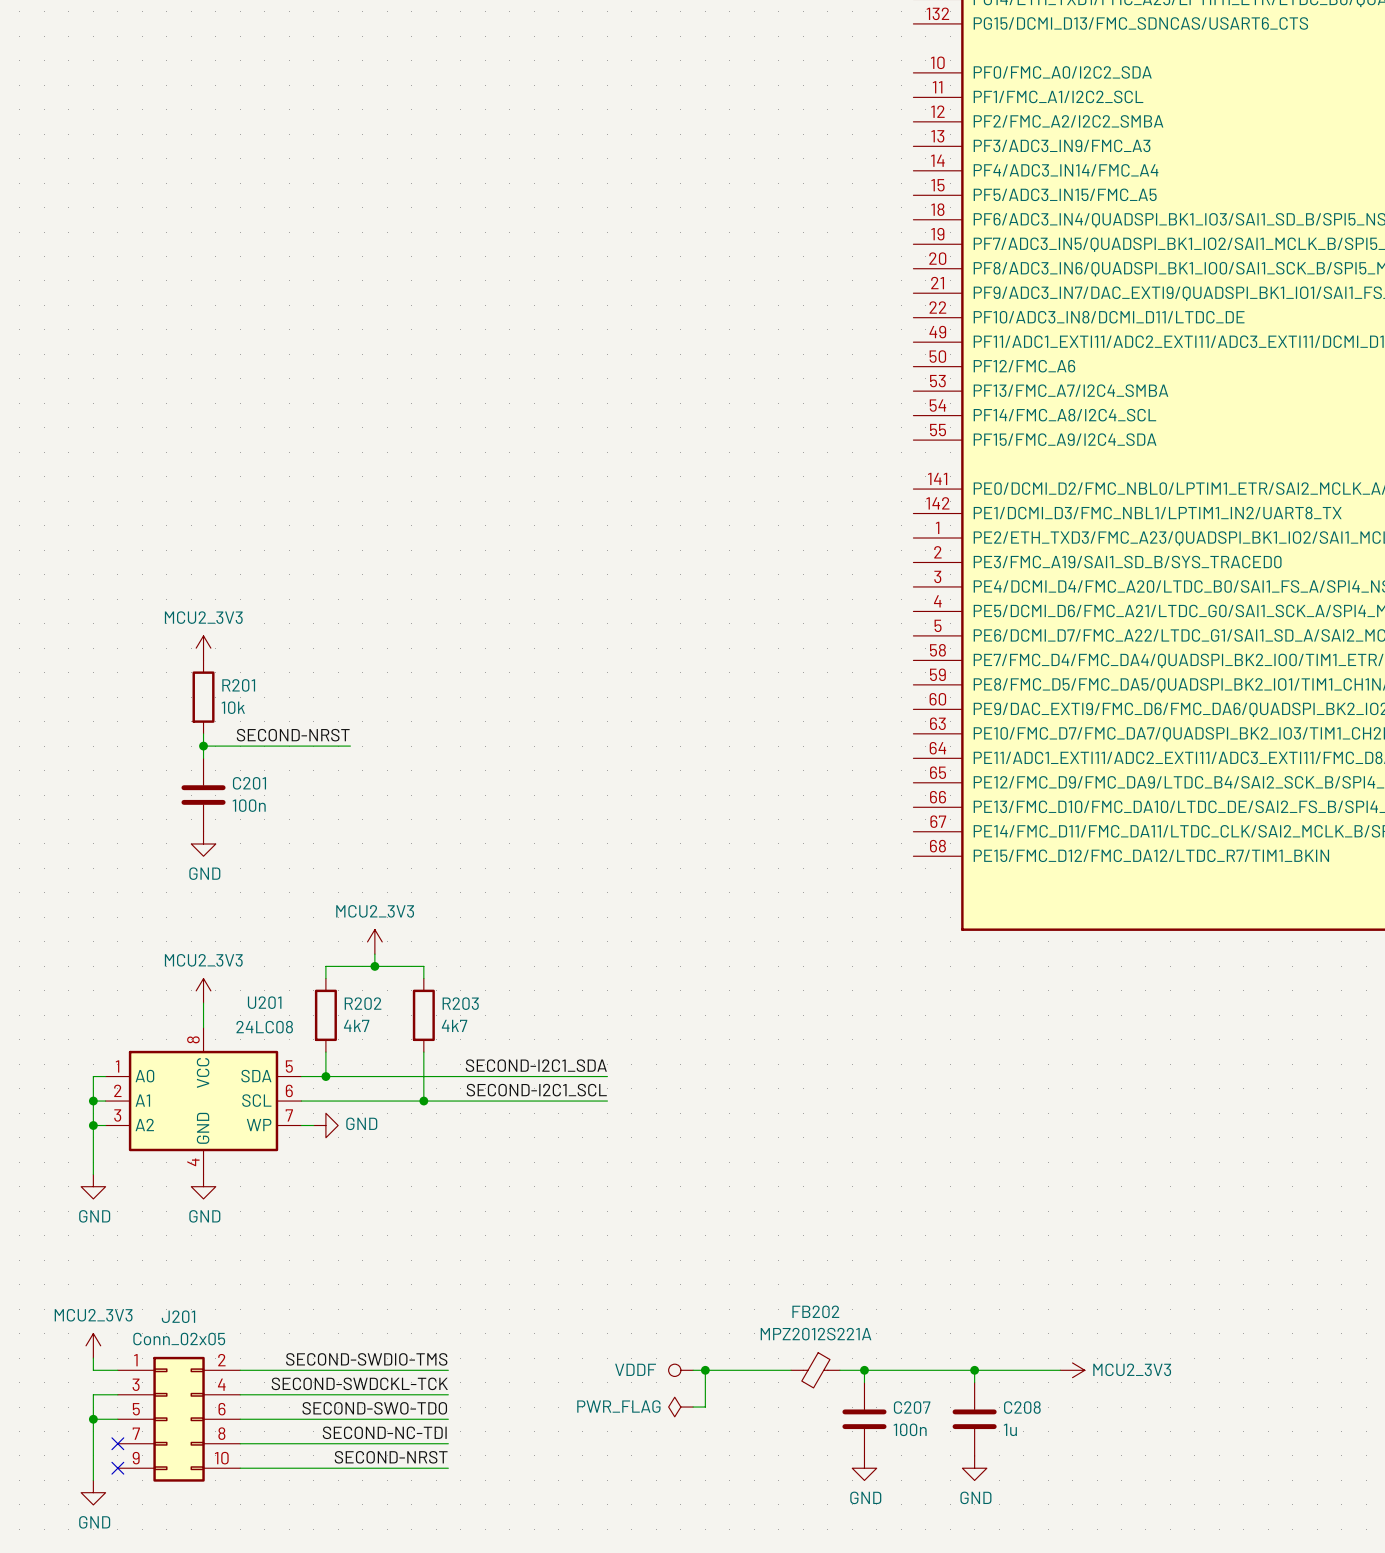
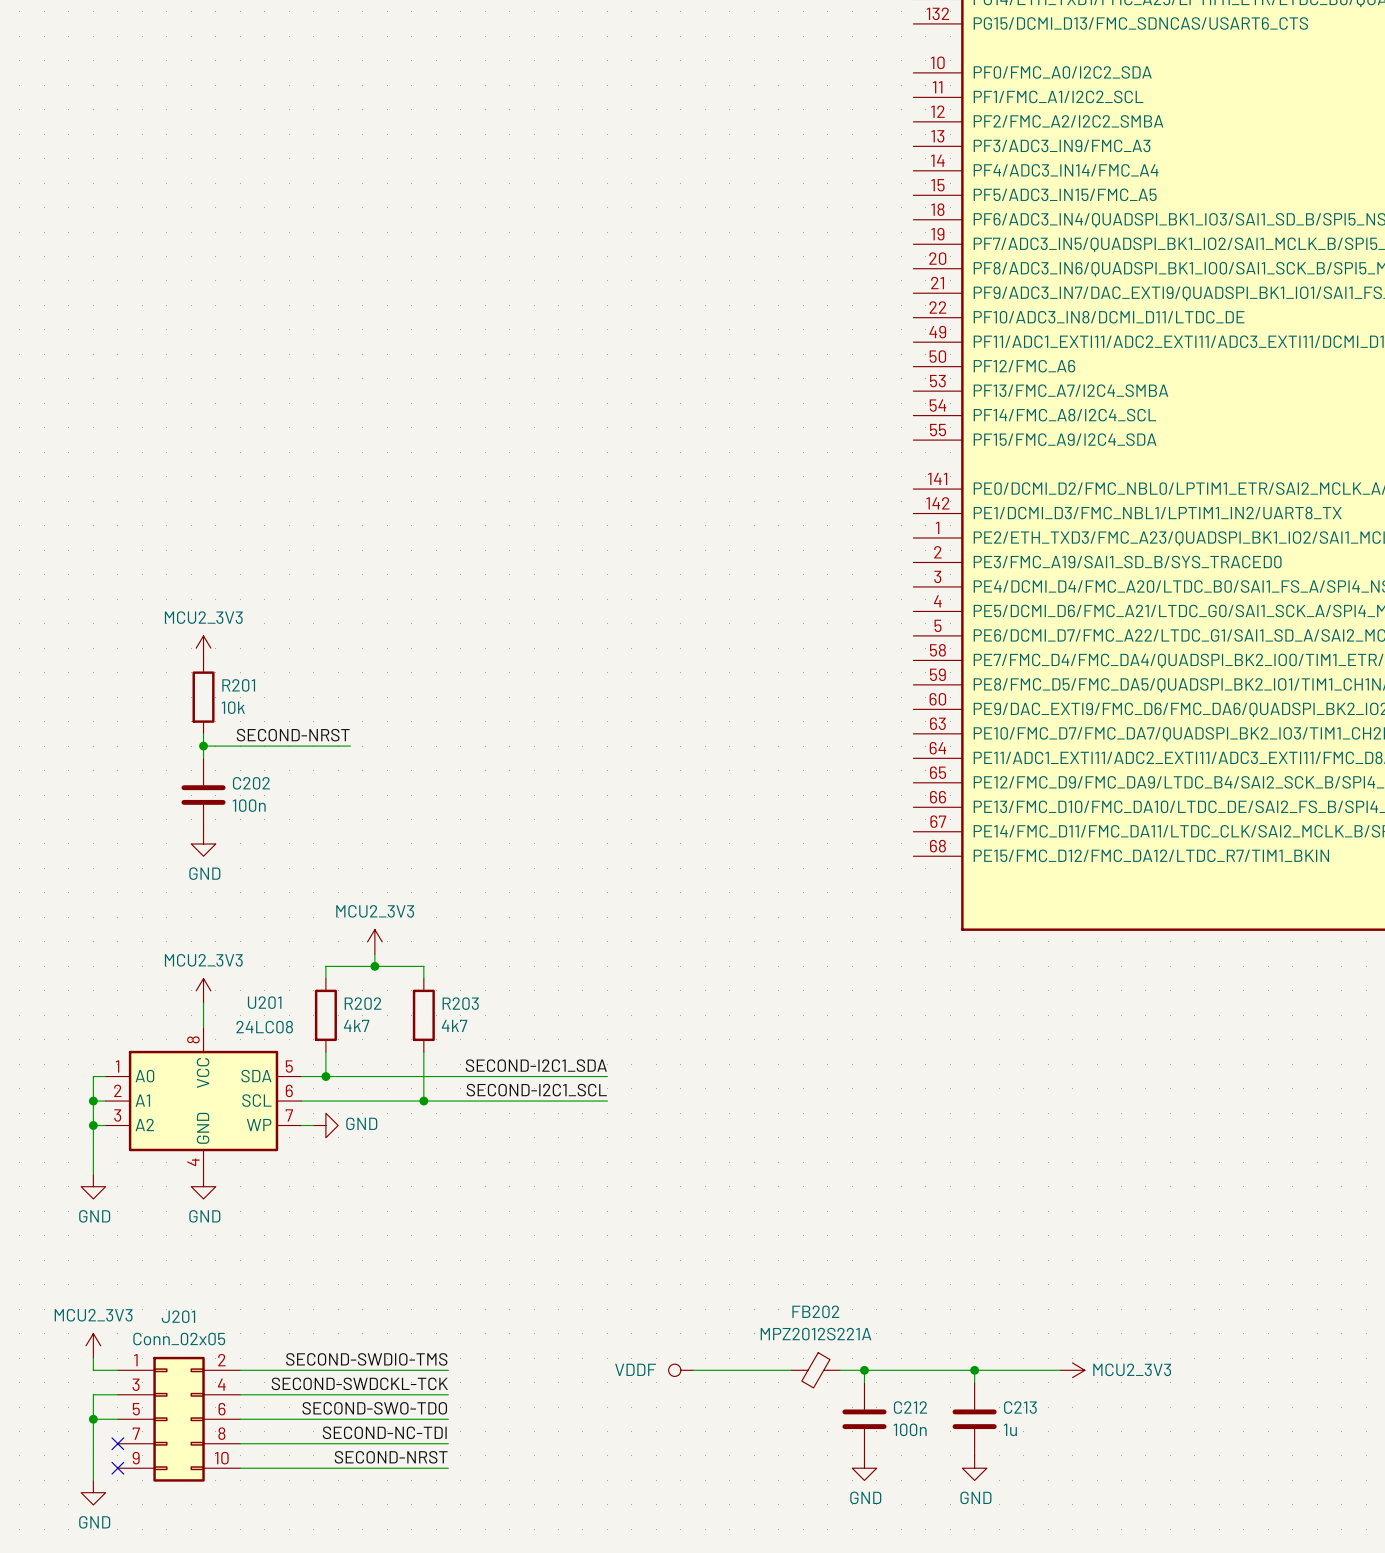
C201 name: C201 (249, 783) -> C202 (251, 783)
wire: (705, 1370) (705, 1407) (693, 1407) -> none
junction: (705, 1370) -> none
power symbol: PWR_FLAG (680, 1407) -> none
C207 name: C207 (912, 1407) -> C212 (910, 1407)
C208 name: C208 (1022, 1407) -> C213 (1020, 1407)

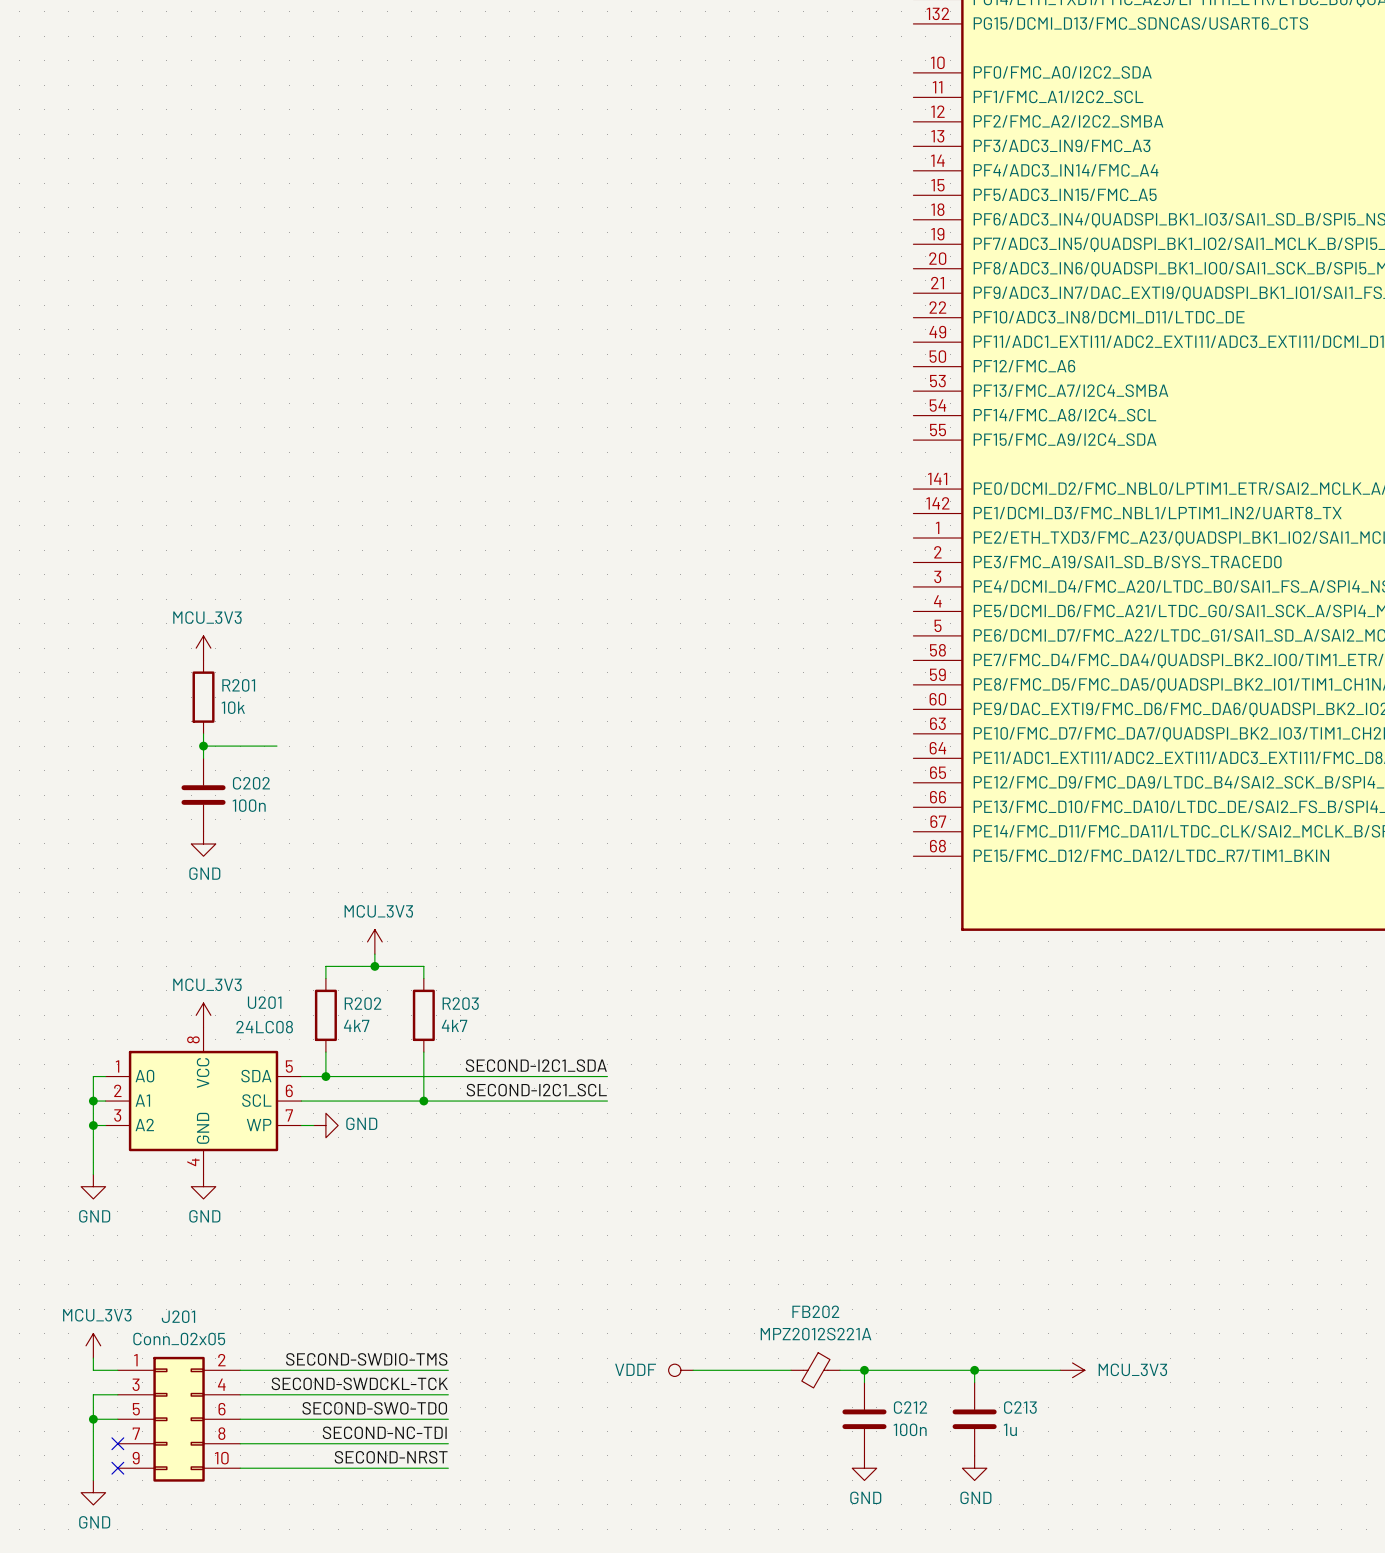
power symbol: MCU2_3V3 (203, 648) -> MCU_3V3 (203, 648)
label: SECOND-NRST (293, 735) -> none
wire: (276, 746) (350, 746) -> none
power symbol: MCU2_3V3 (374, 941) -> MCU_3V3 (374, 941)
power symbol: MCU2_3V3 (203, 990) -> none
power symbol: none -> MCU_3V3 (203, 1015)
power symbol: MCU2_3V3 (93, 1345) -> MCU_3V3 (93, 1345)
power symbol: MCU2_3V3 (1072, 1370) -> MCU_3V3 (1072, 1370)

